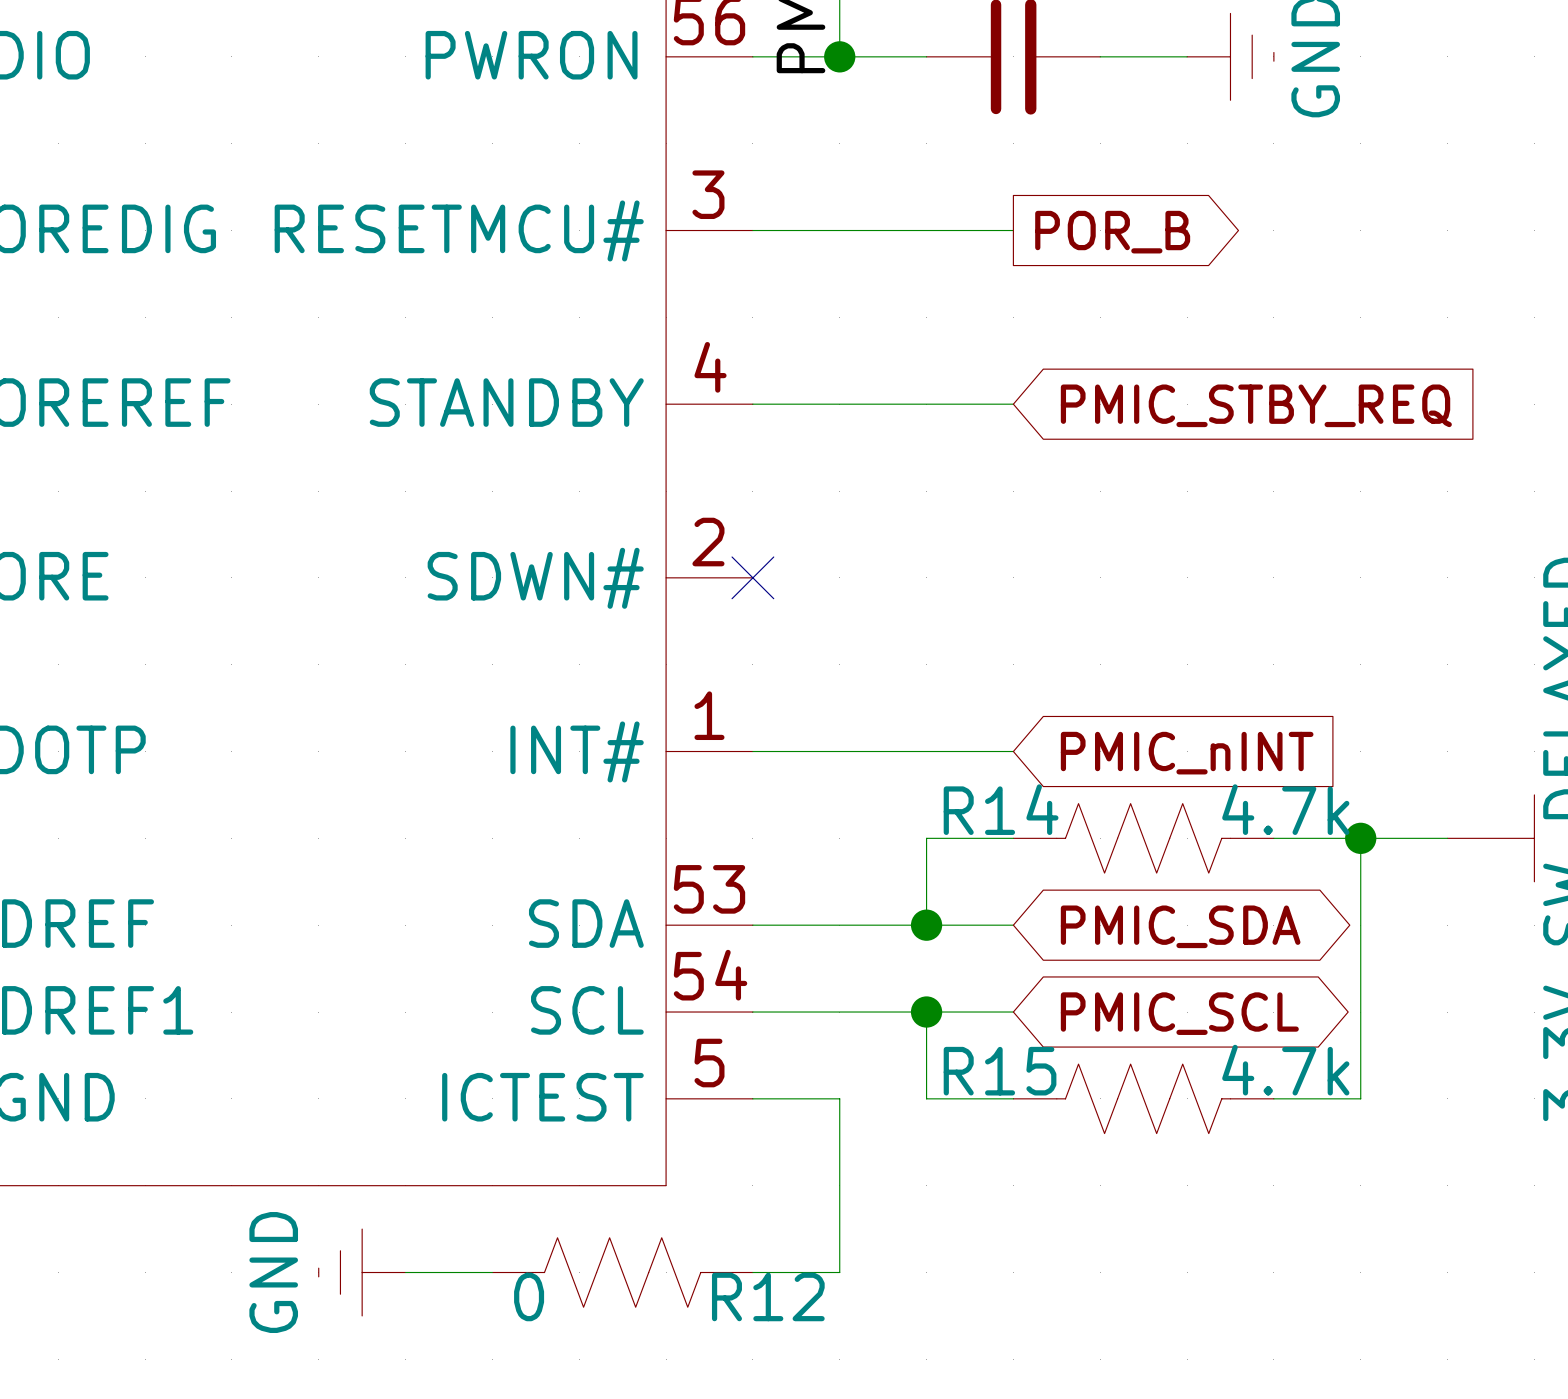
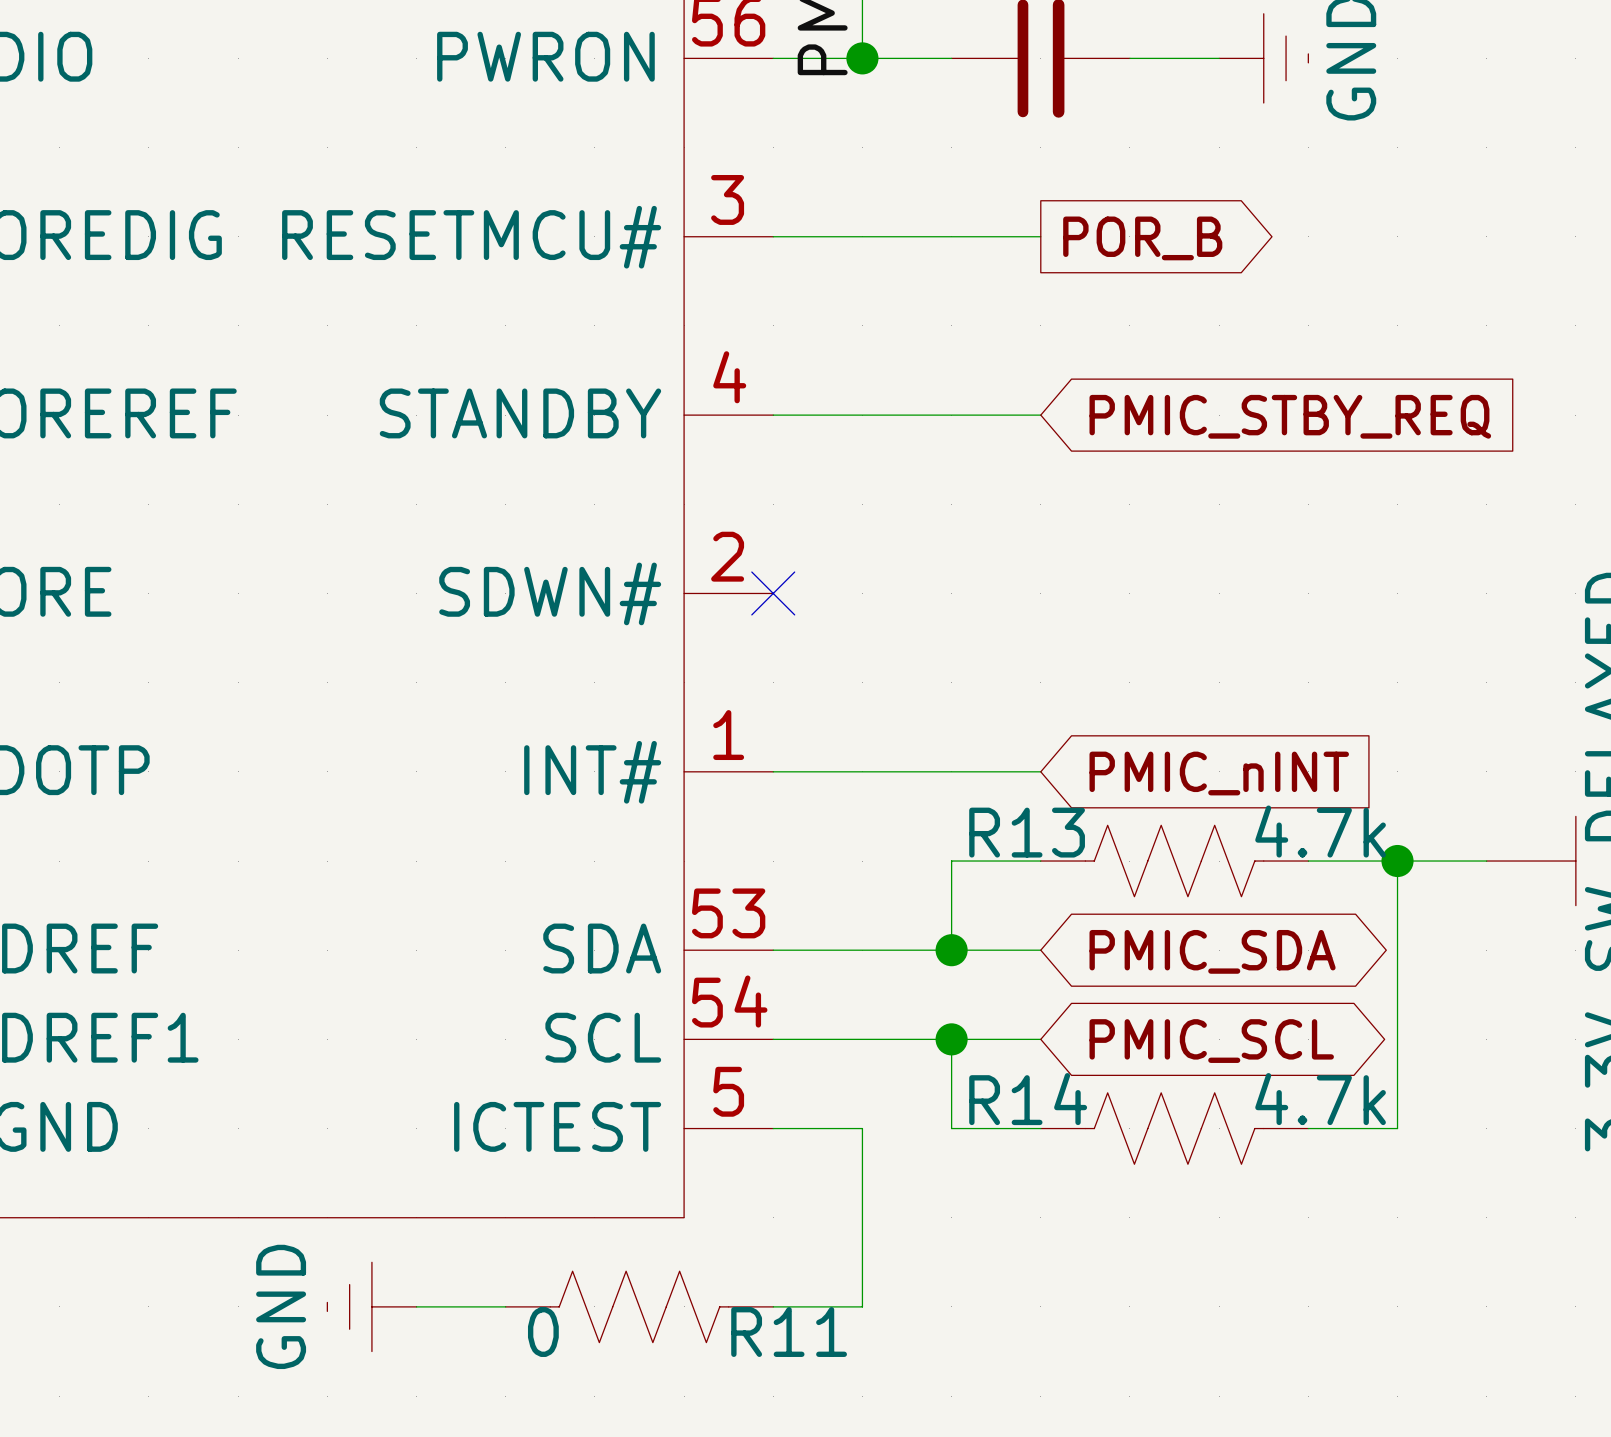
R14 name: R14 (1001, 809) -> R13 (1027, 832)
R15 name: R15 (1000, 1071) -> R14 (1028, 1099)
R12 name: R12 (768, 1296) -> R11 (789, 1332)

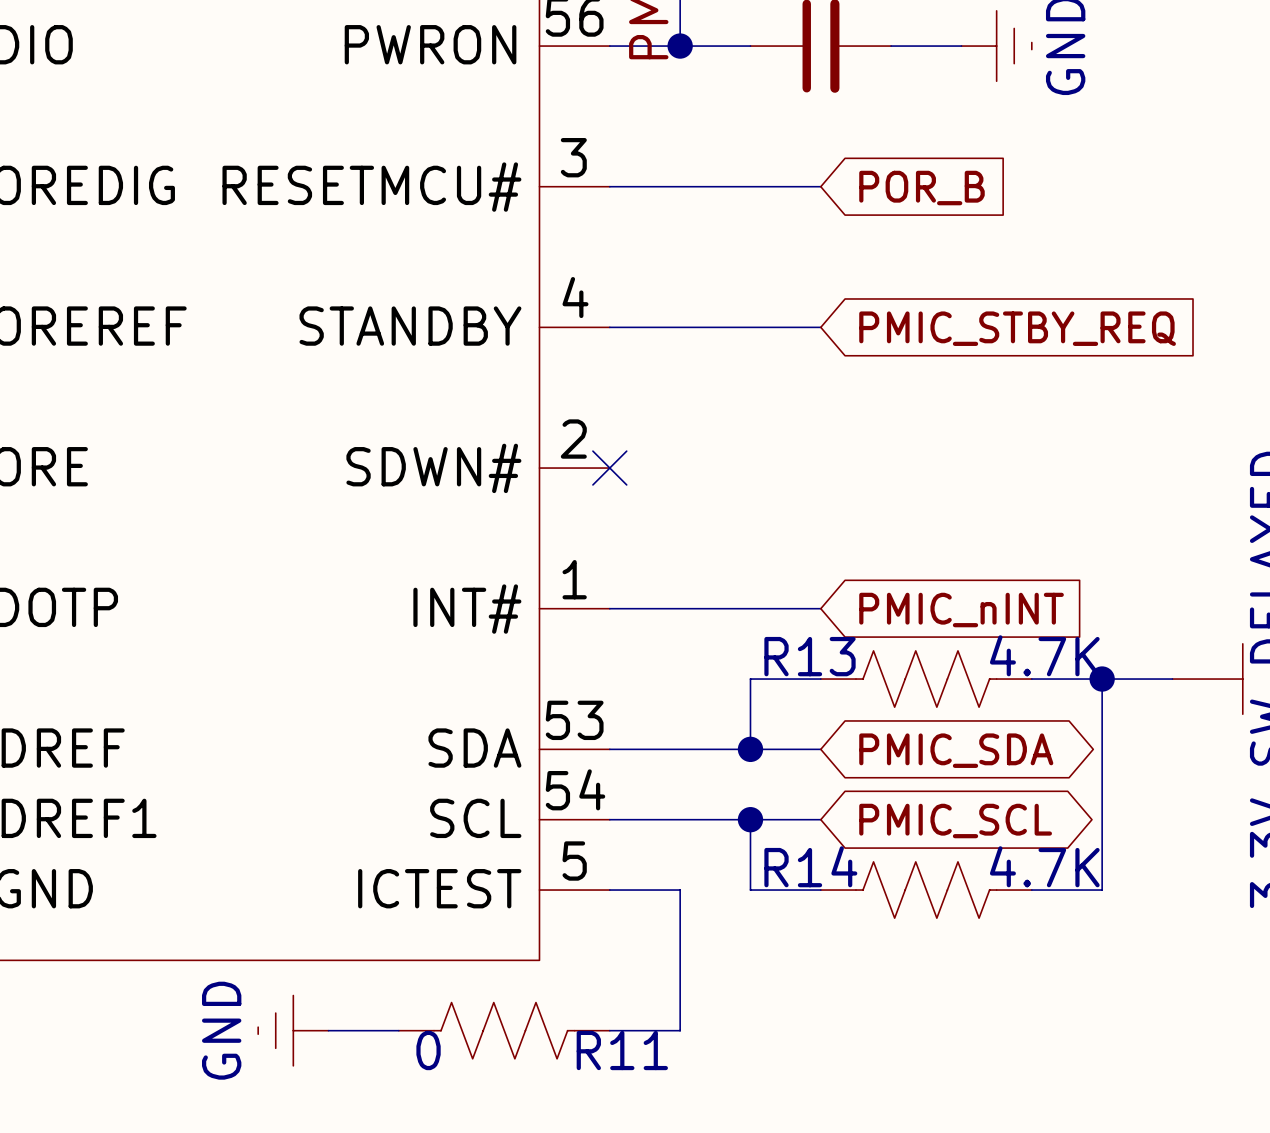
global label shape: output (1142, 238) -> input (921, 188)
R13 value: 4.7k (1320, 831) -> 4.7K (1044, 655)
R14 value: 4.7k (1320, 1099) -> 4.7K (1044, 866)

